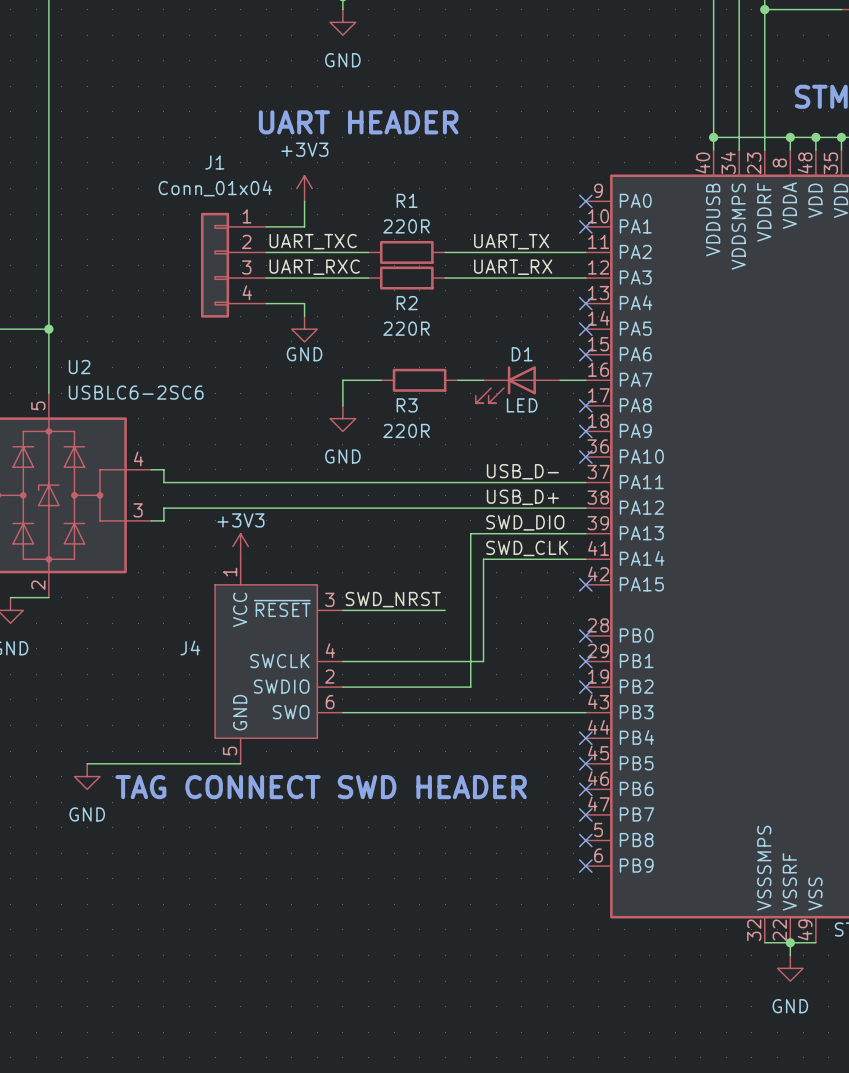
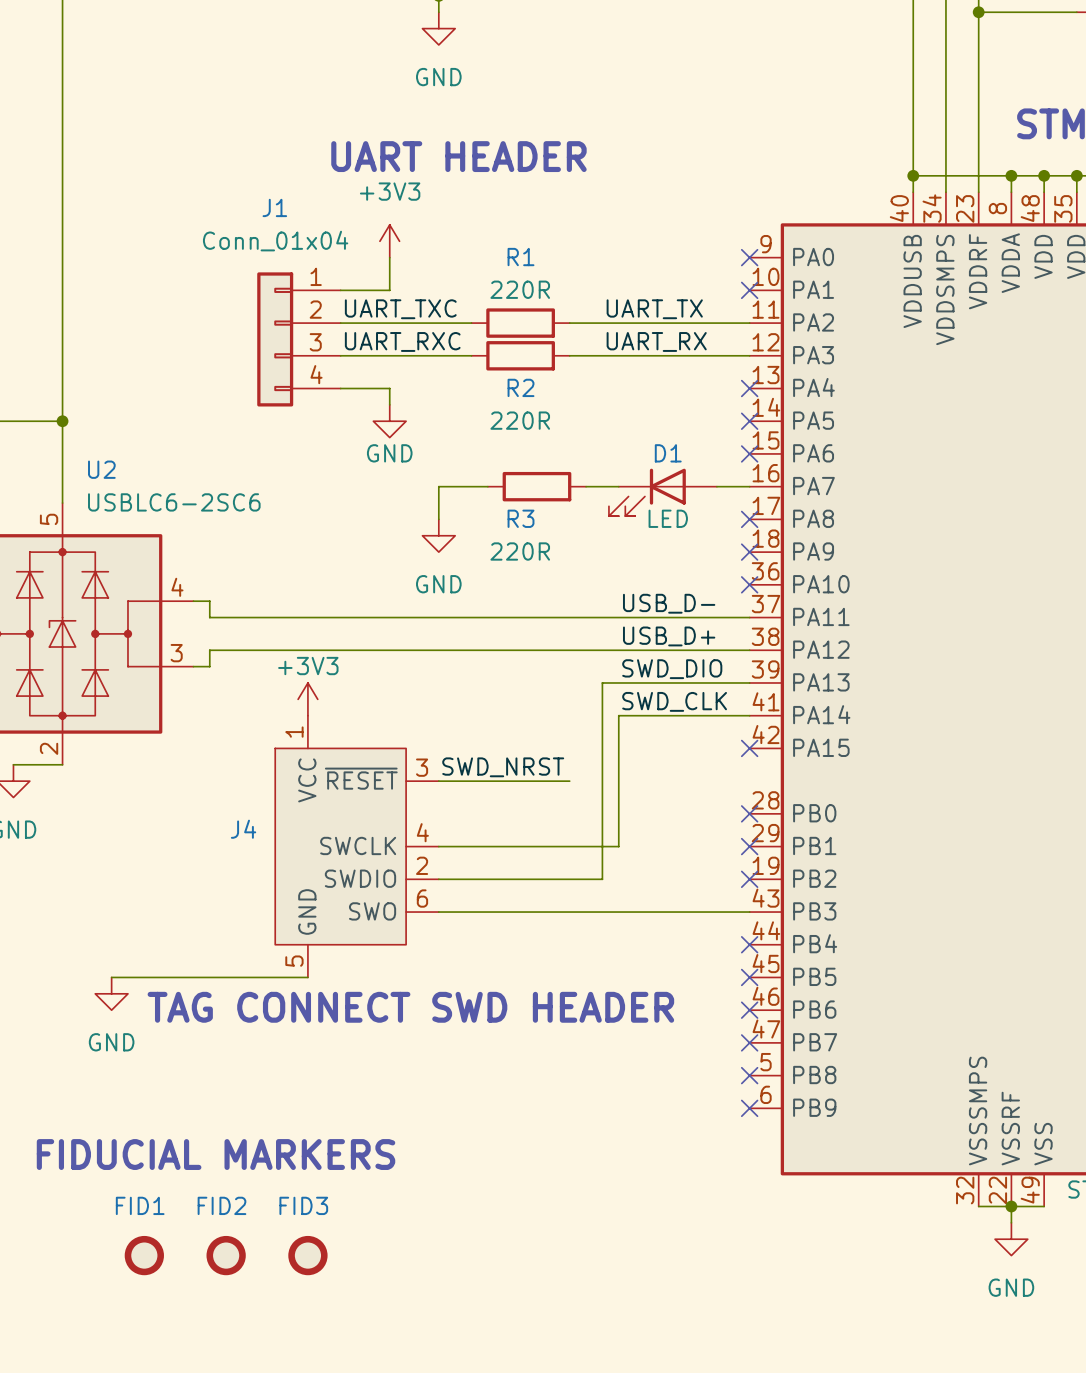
text: none -> FIDUCIAL MARKERS (216, 1154)
FID1: none -> (144, 1255)
FID2: none -> (226, 1255)
FID3: none -> (307, 1255)

